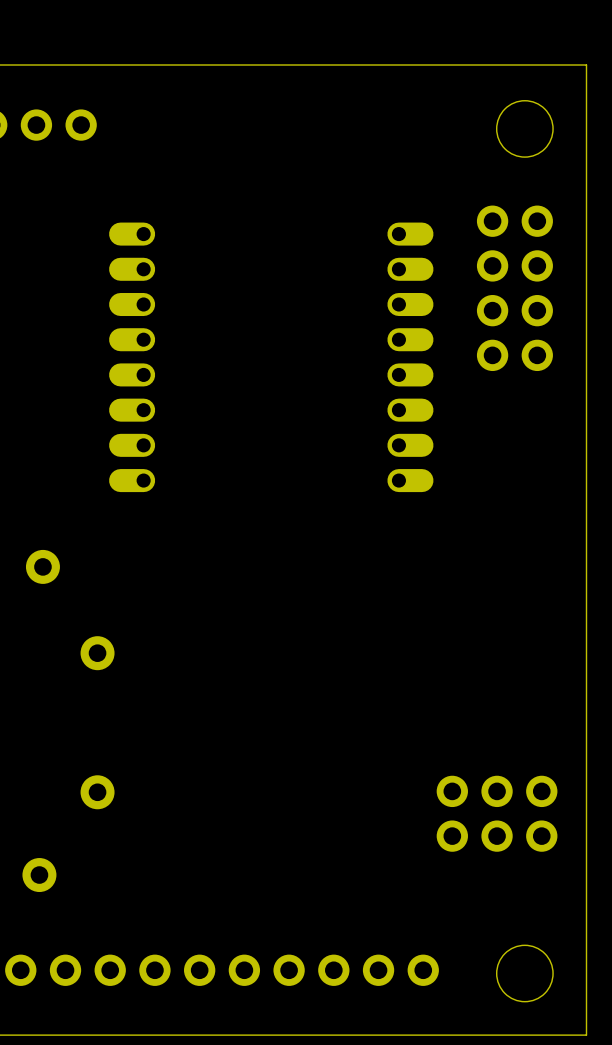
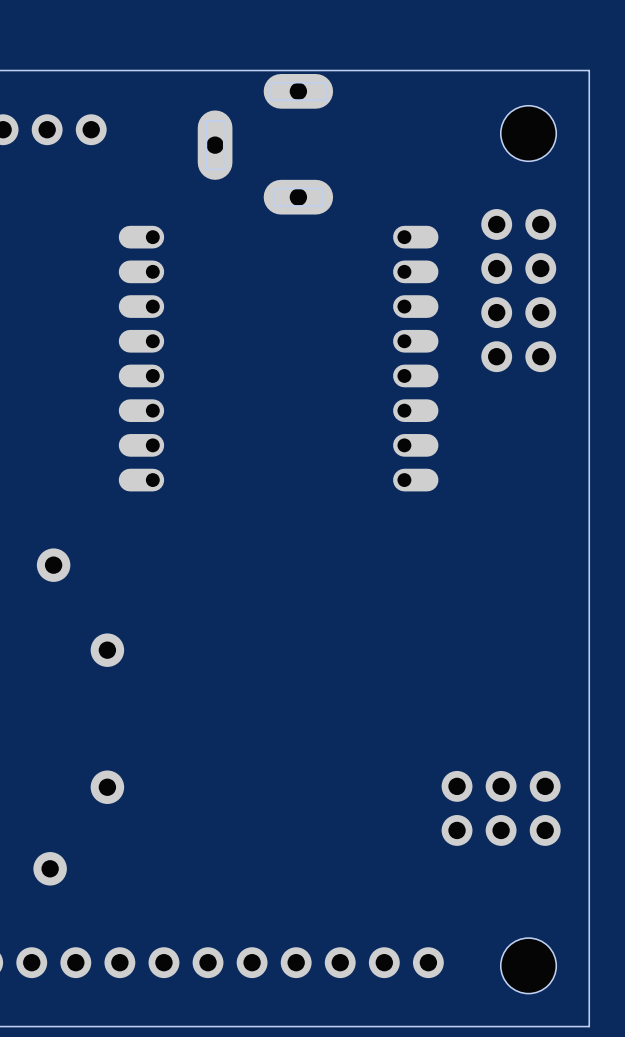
part: none -> (265, 144)

